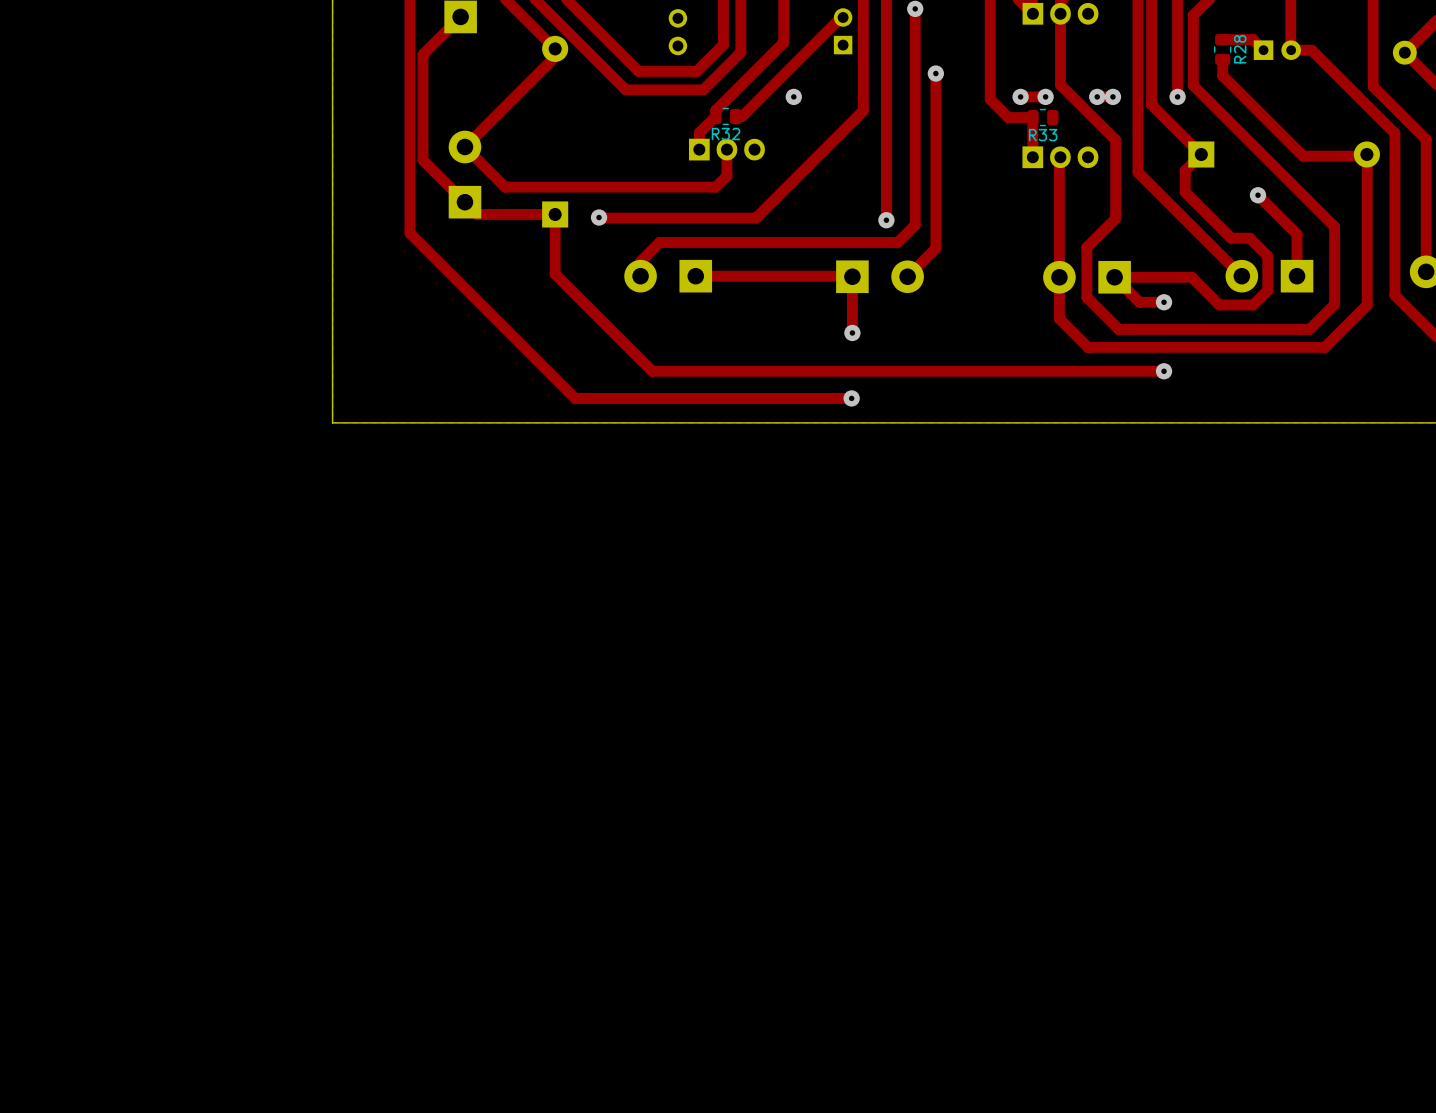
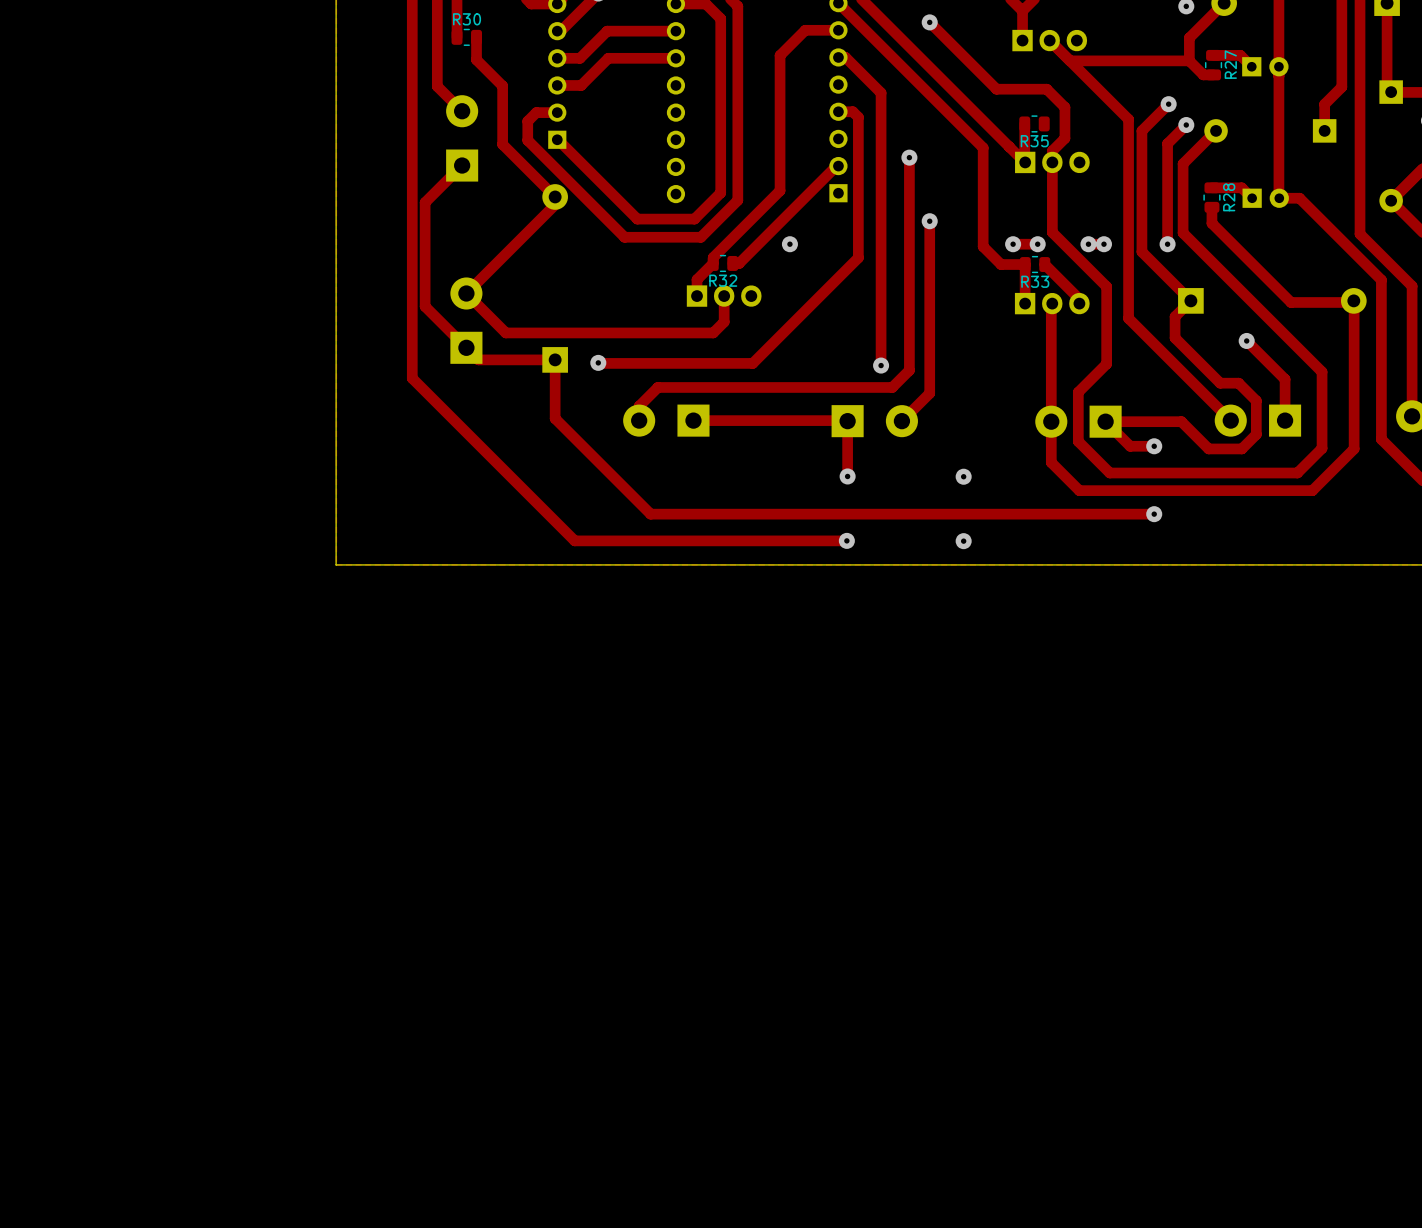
track: none -> (1044, 264) (1079, 299) (1079, 303)
via: none -> (963, 476)
via: none -> (963, 541)

